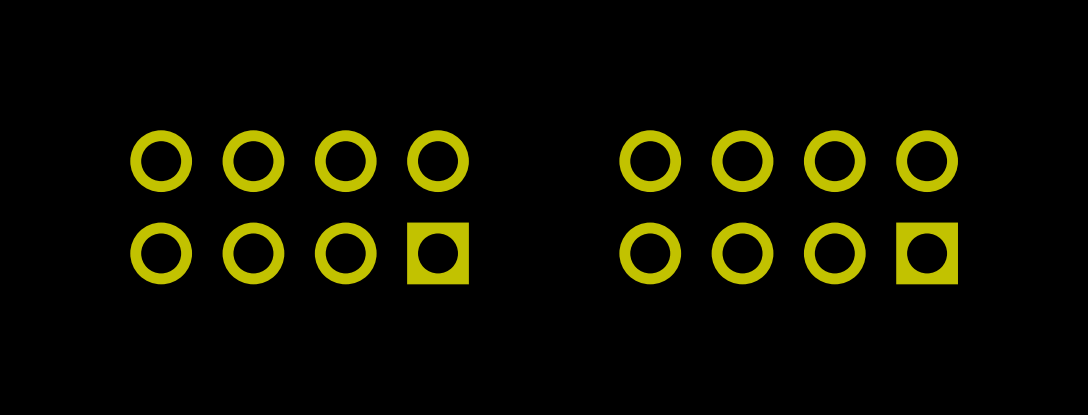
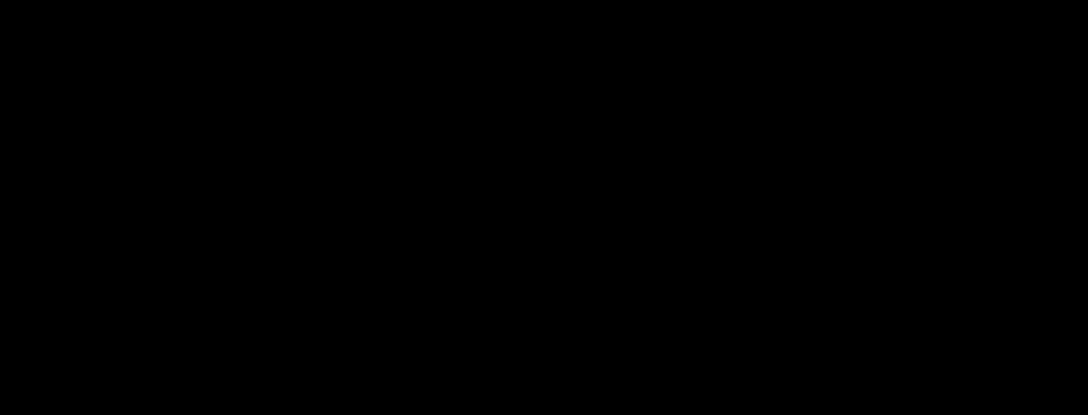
part: (299, 207) -> none
part: (788, 207) -> none

